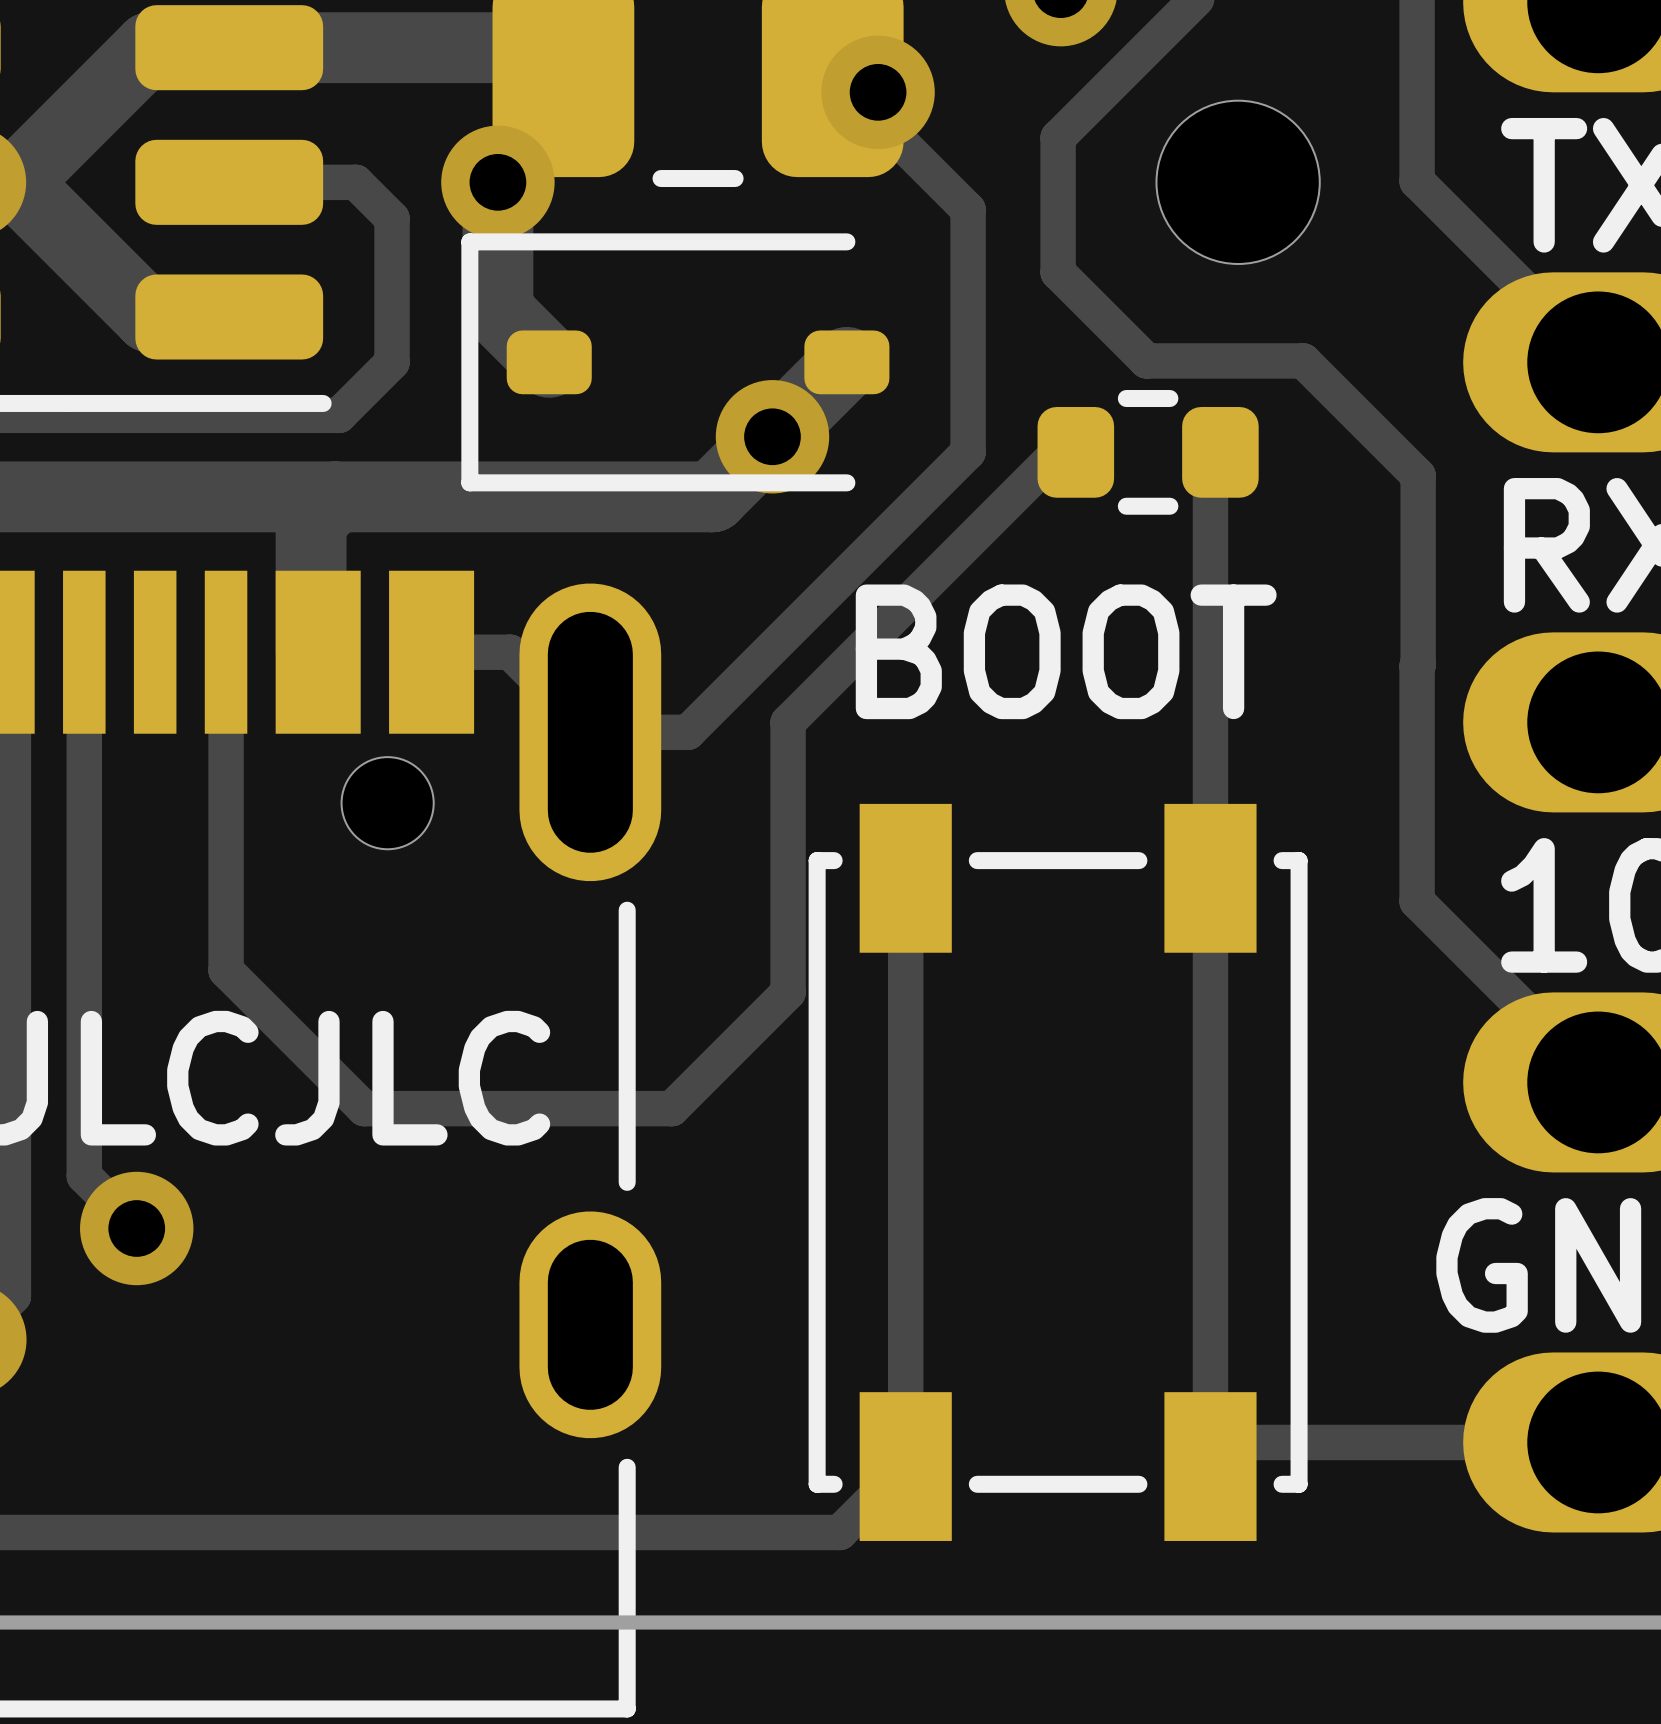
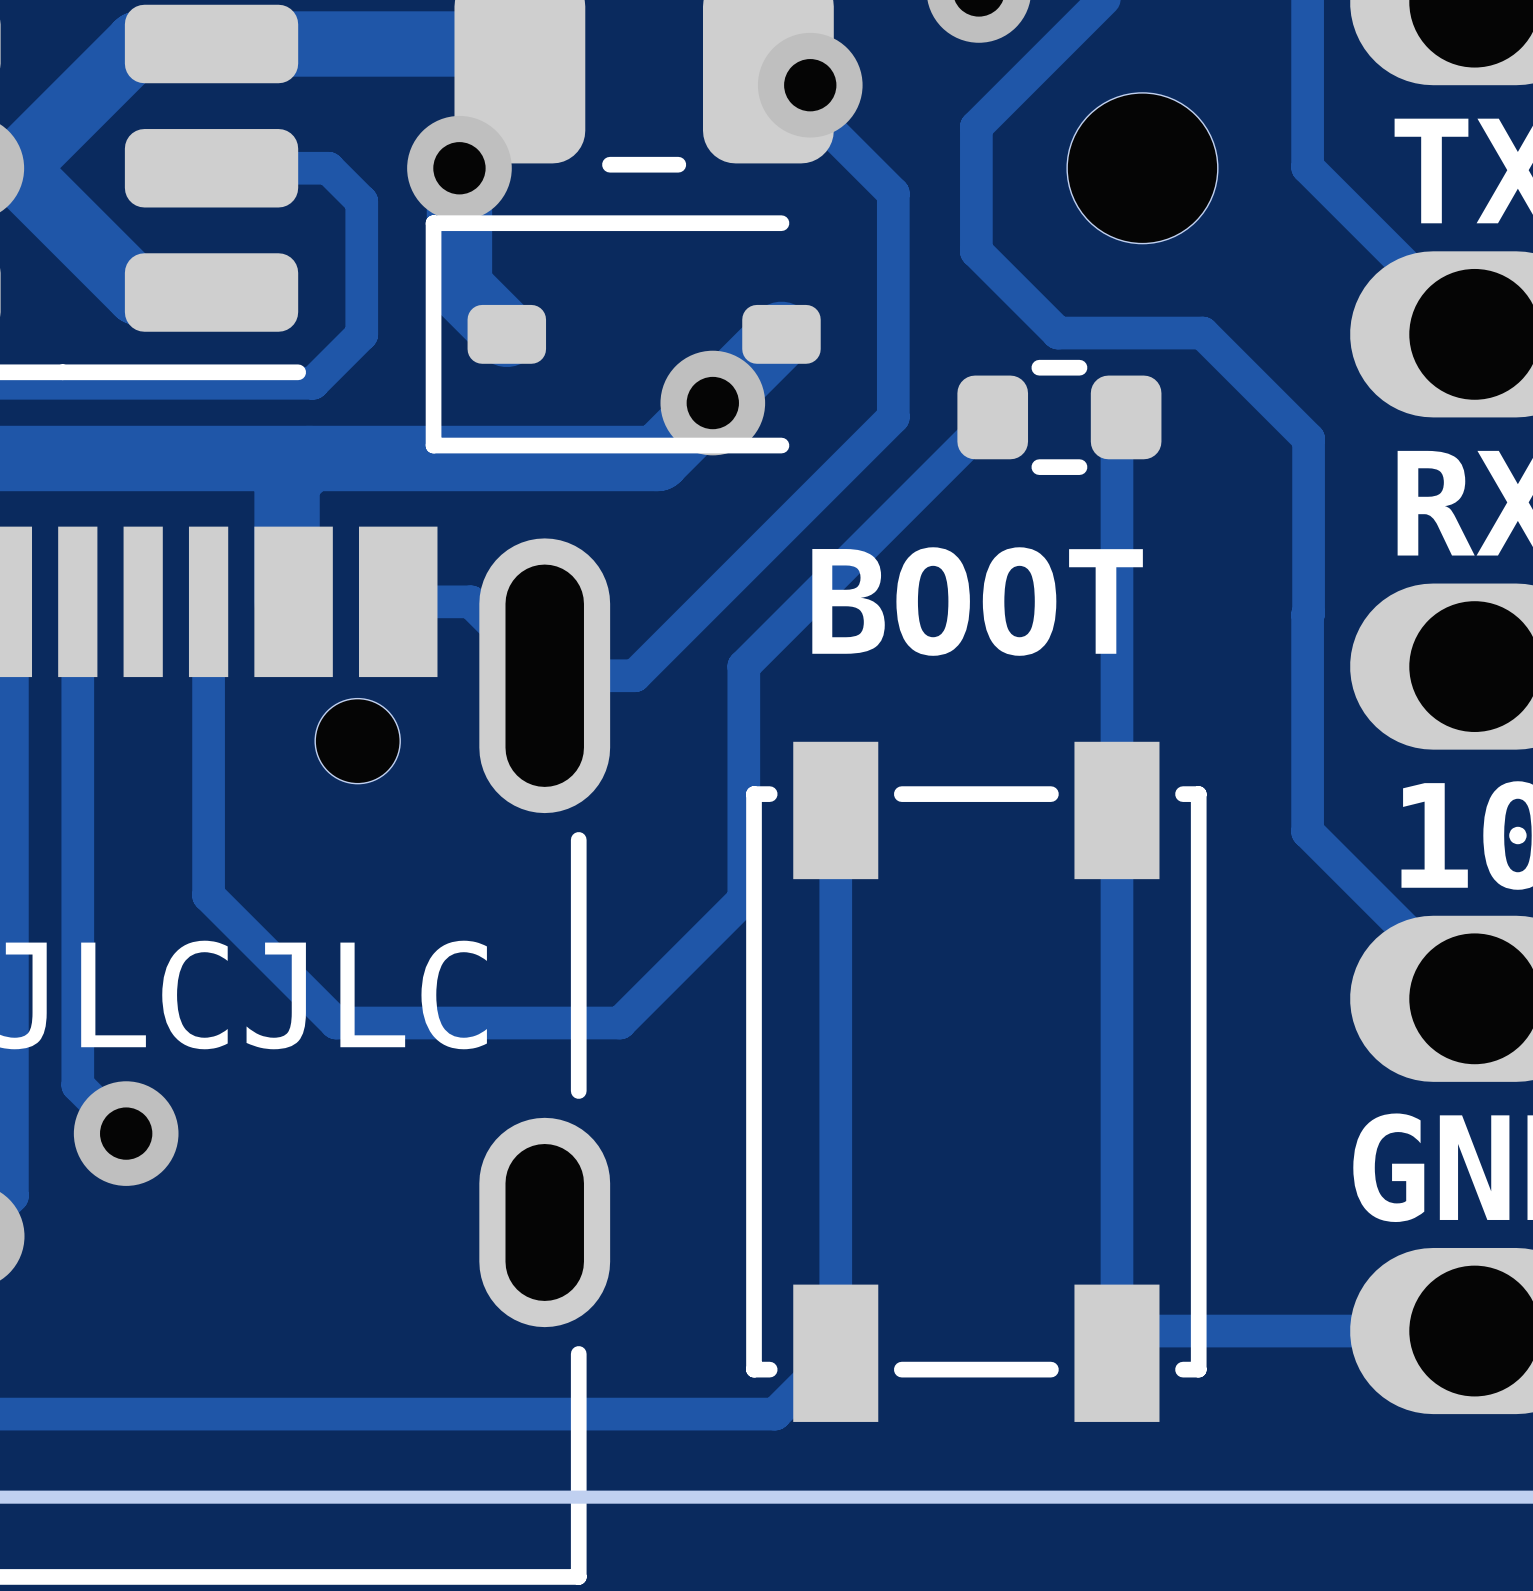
track: (1075, 452) (1058, 452) (788, 722) (788, 992) -> (992, 417) (743, 666) (743, 899) (727, 915)

